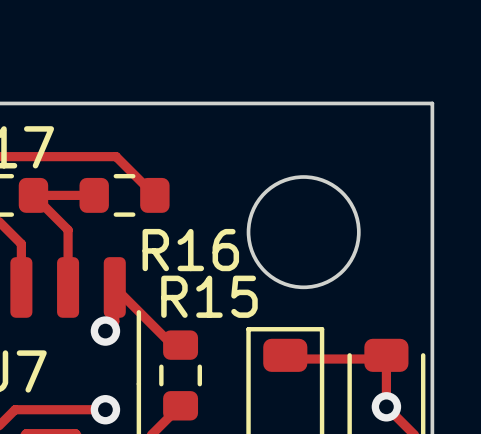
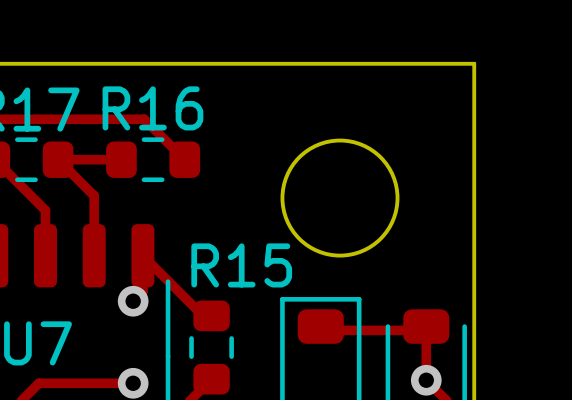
R16 name position: R16 (190, 250) -> R16 (152, 108)

